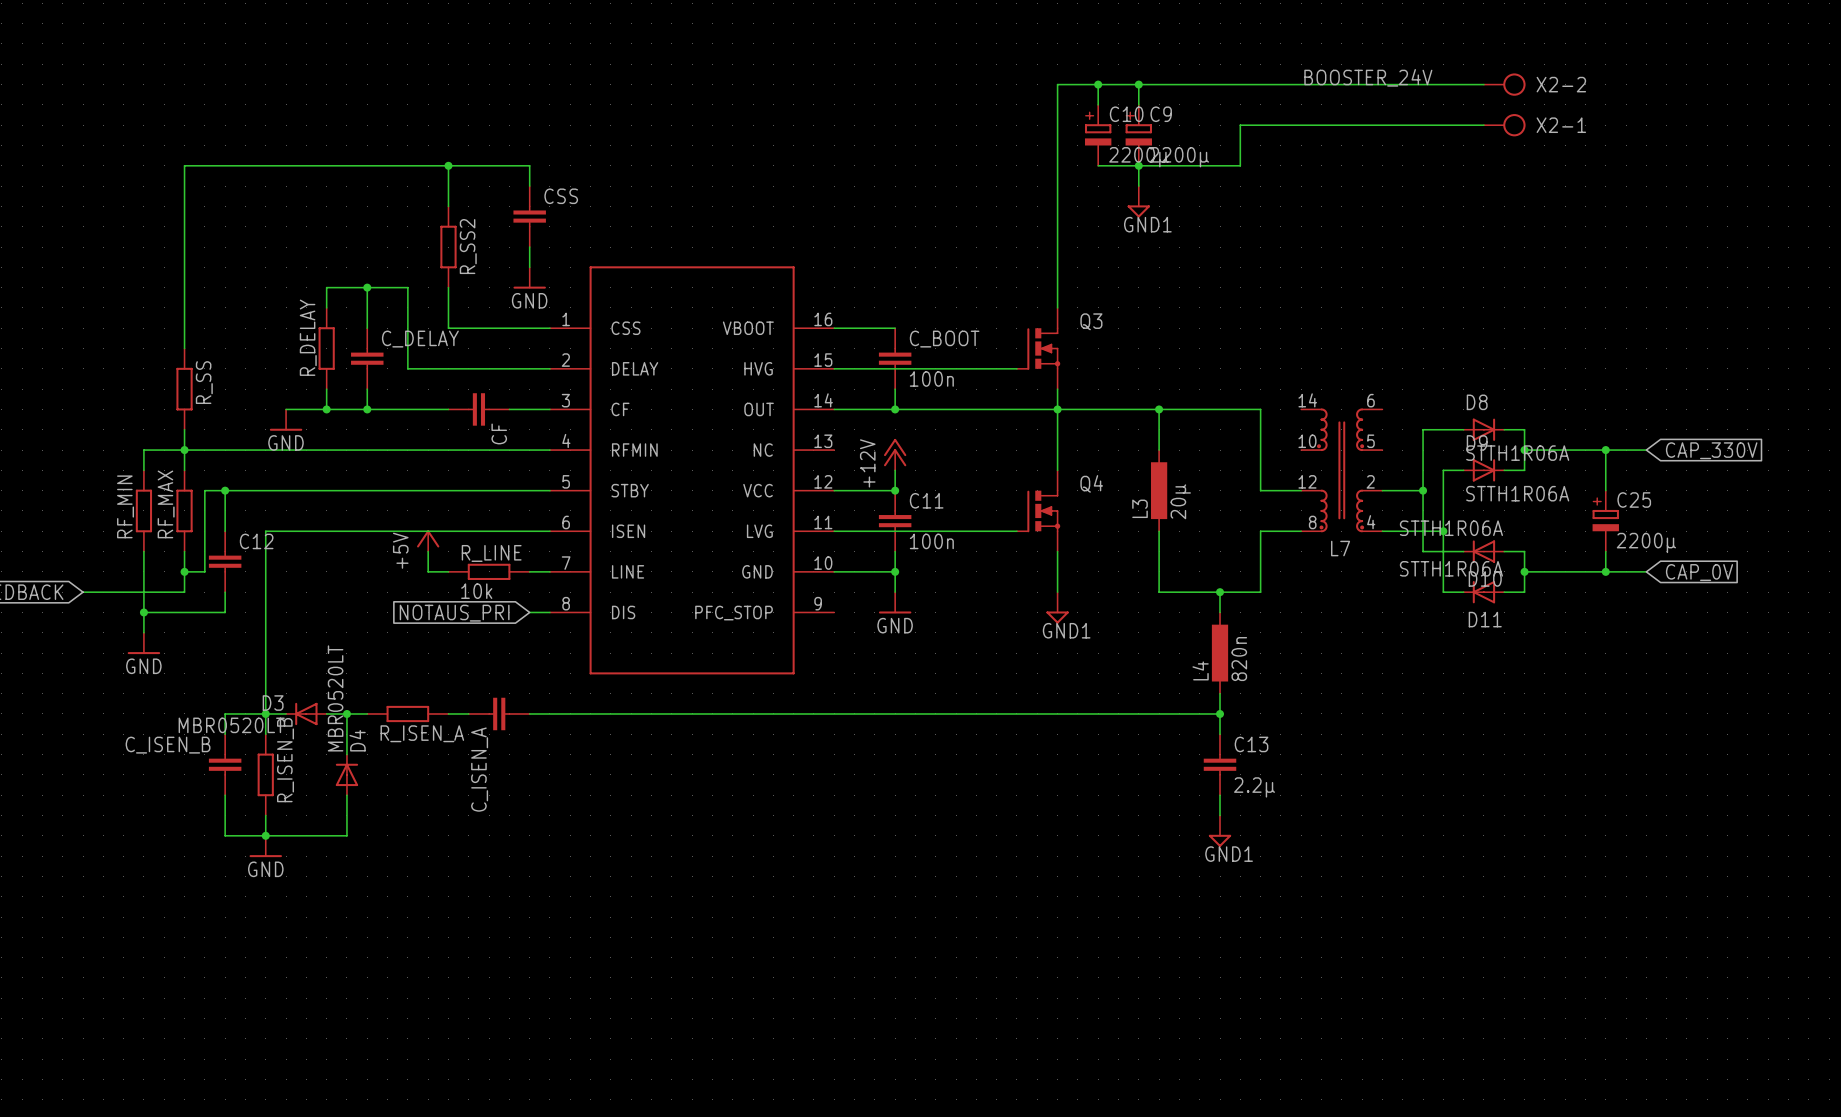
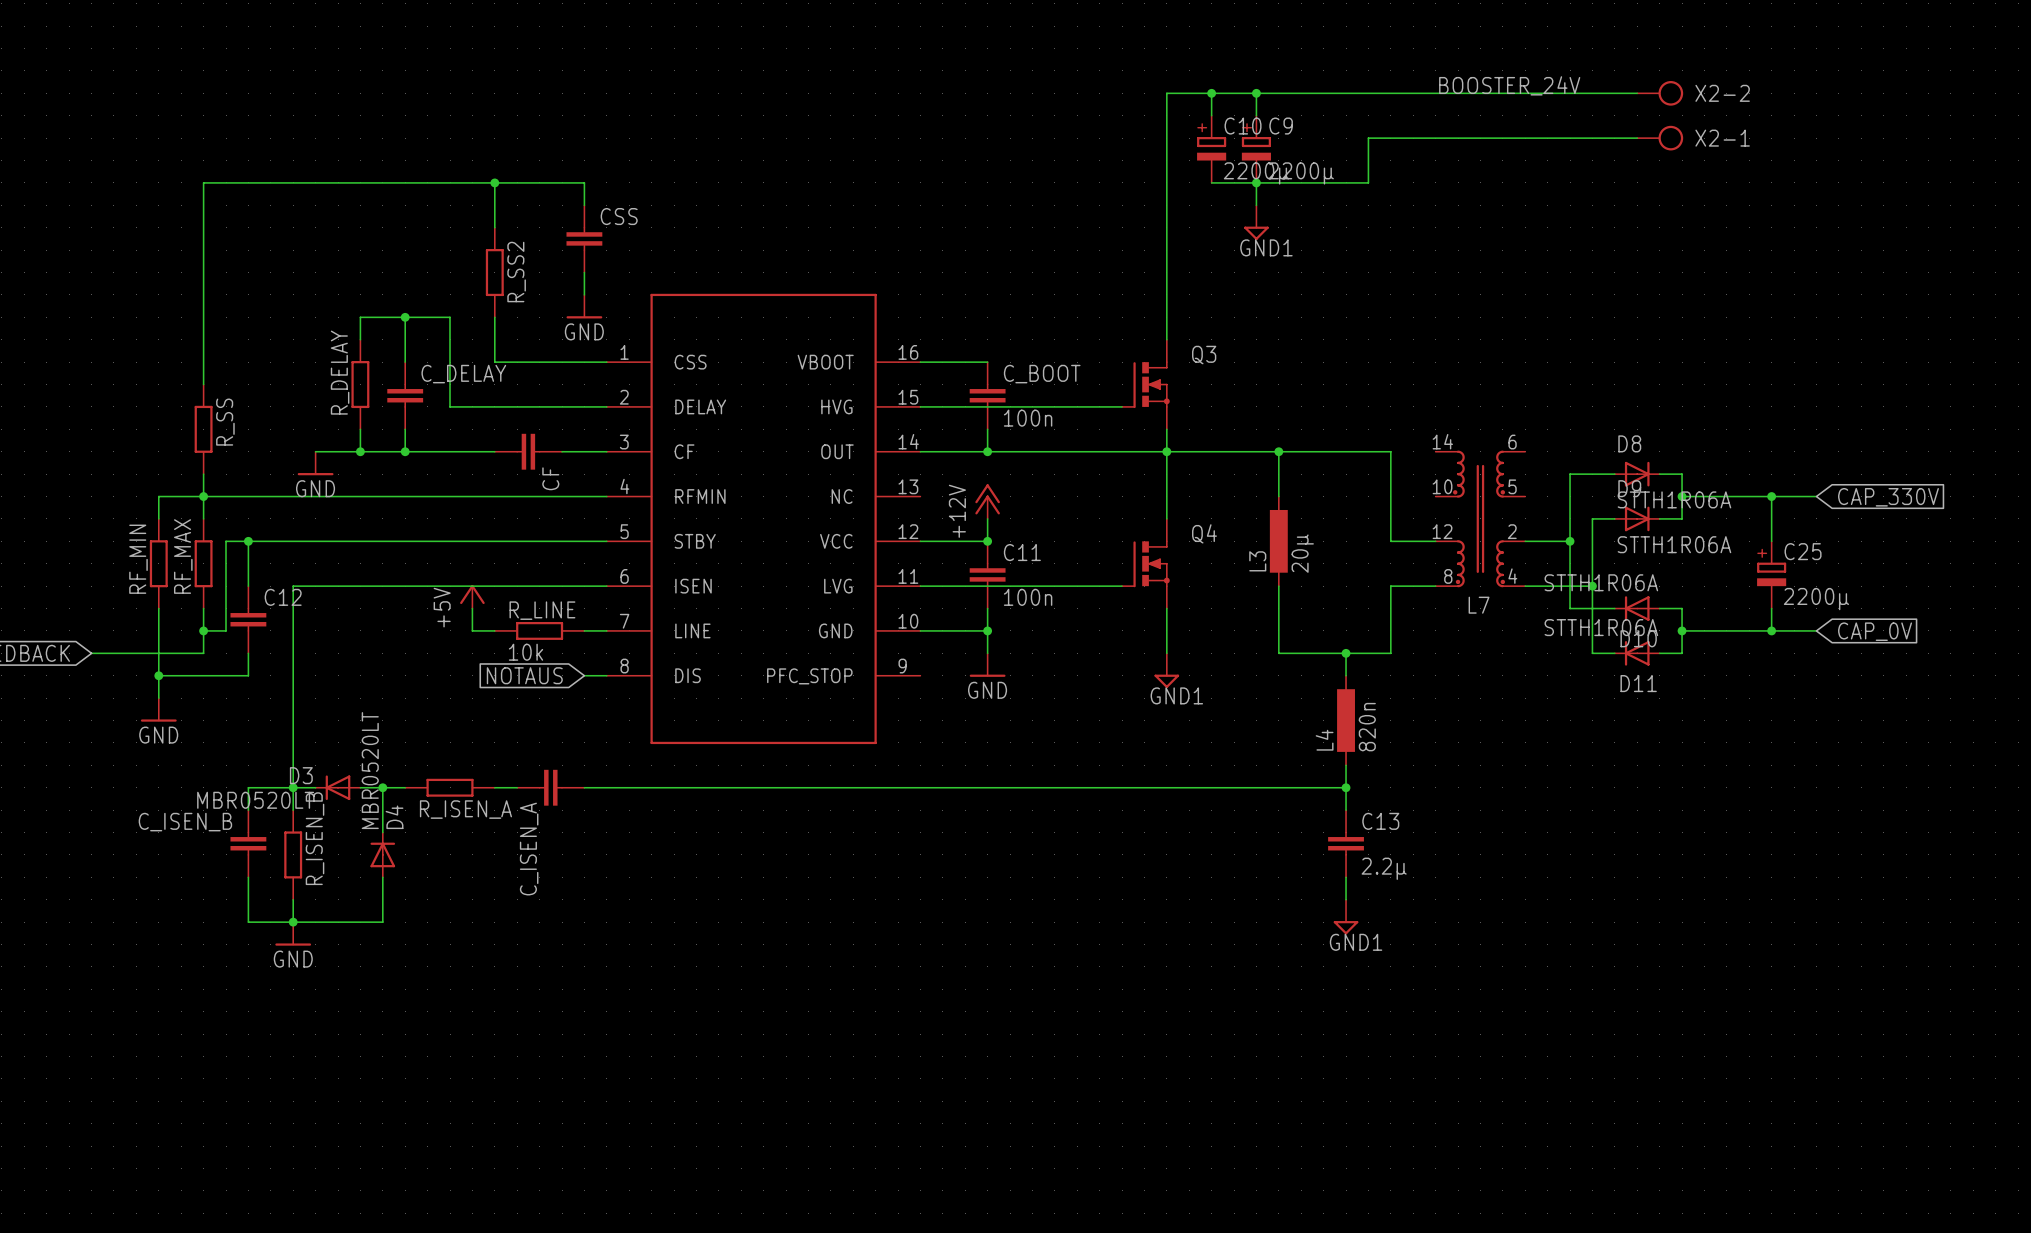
global label: NOTAUS_PRI (454, 613) -> NOTAUS (524, 675)

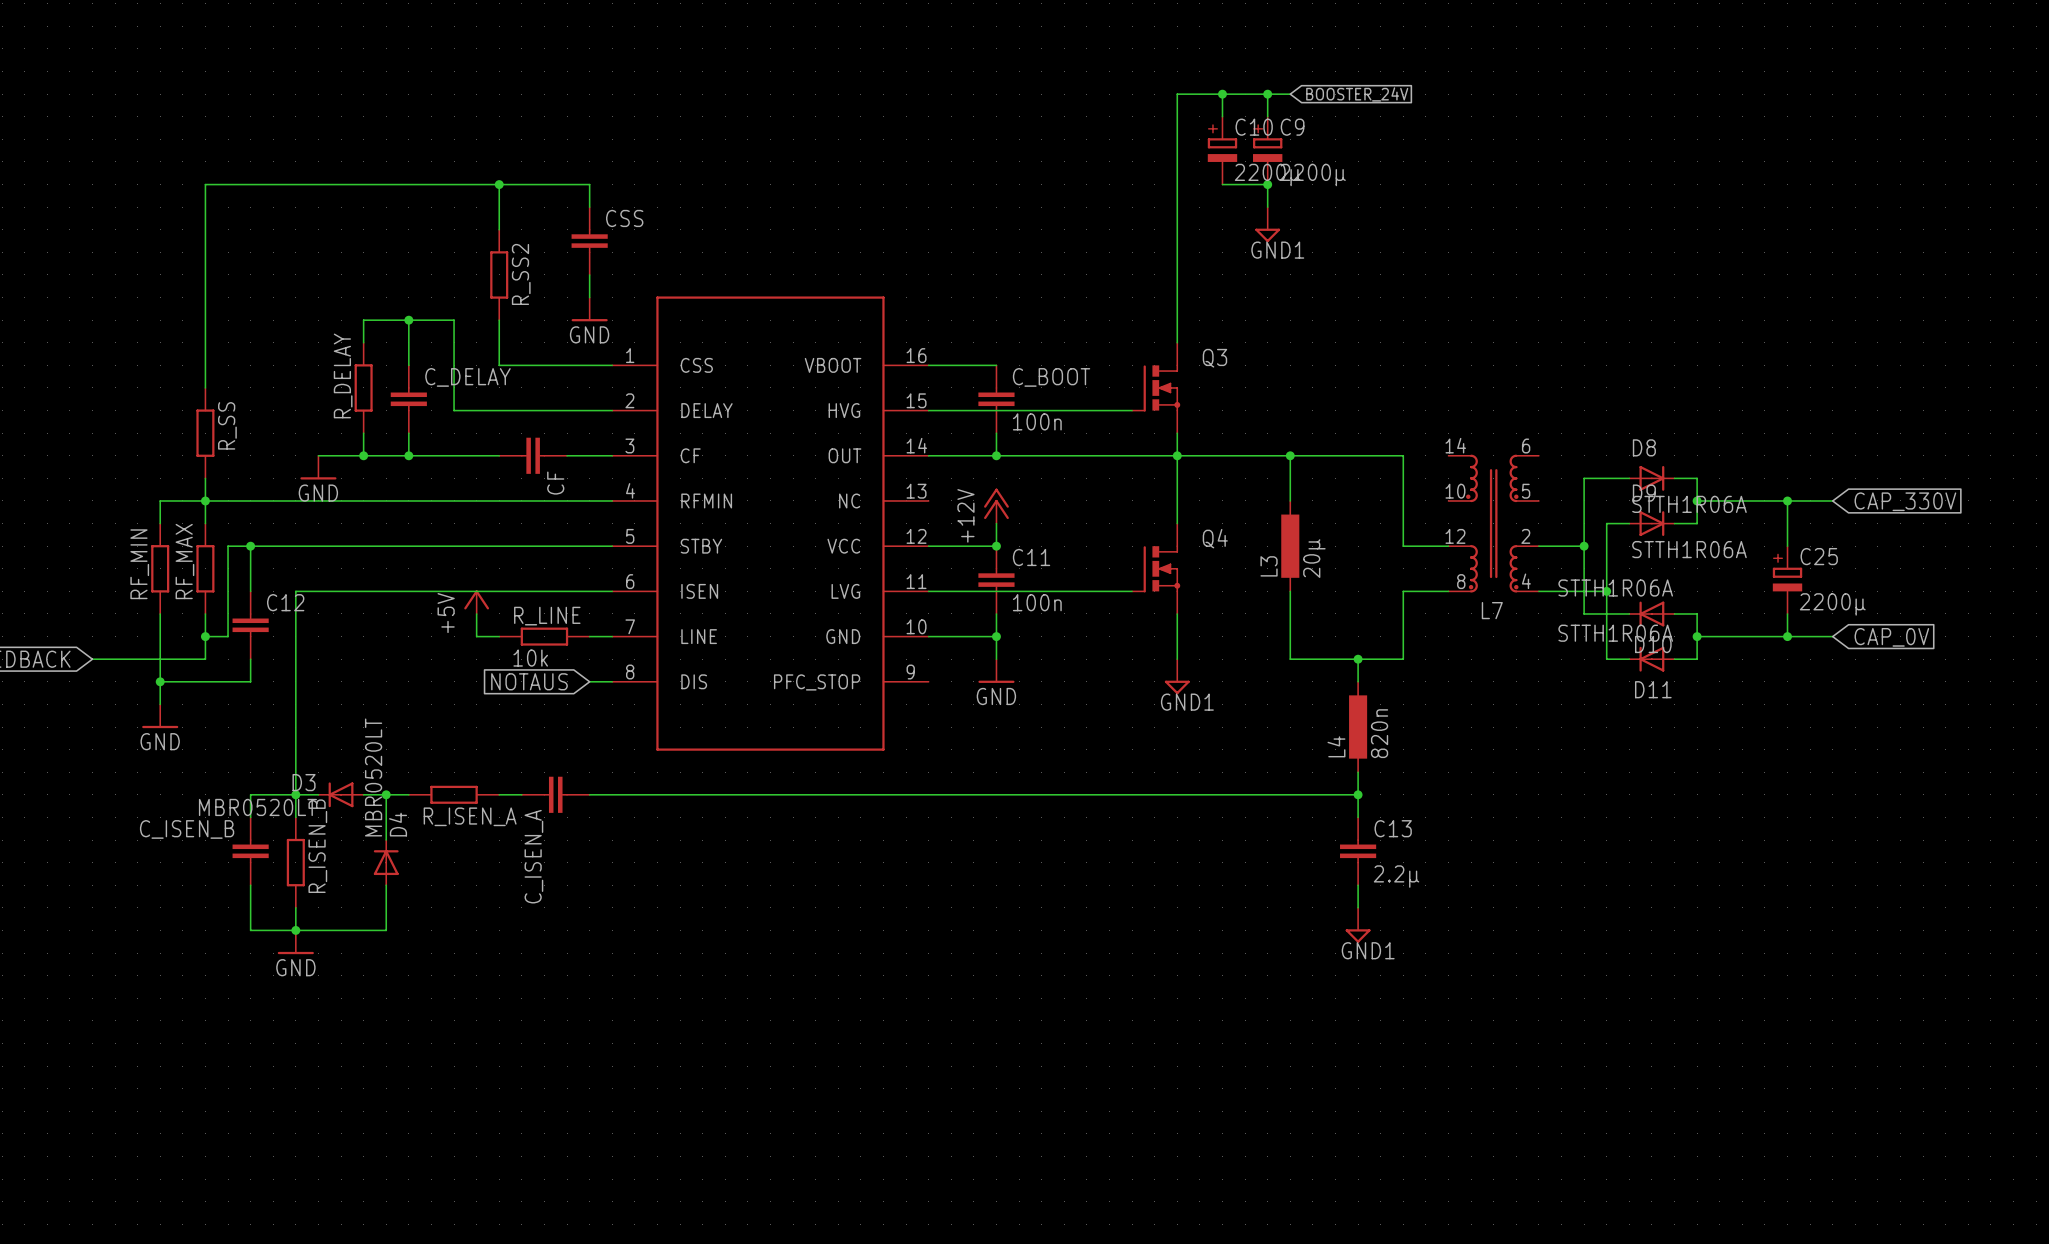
label: BOOSTER_24V (1509, 85) -> none
wire: (1278, 93) (1637, 93) -> none
global label: none -> BOOSTER_24V (1357, 94)
X2-2: (1660, 93) -> none
wire: (1637, 138) (1368, 138) (1368, 182) (1256, 182) -> none
X2-1: (1660, 138) -> none

